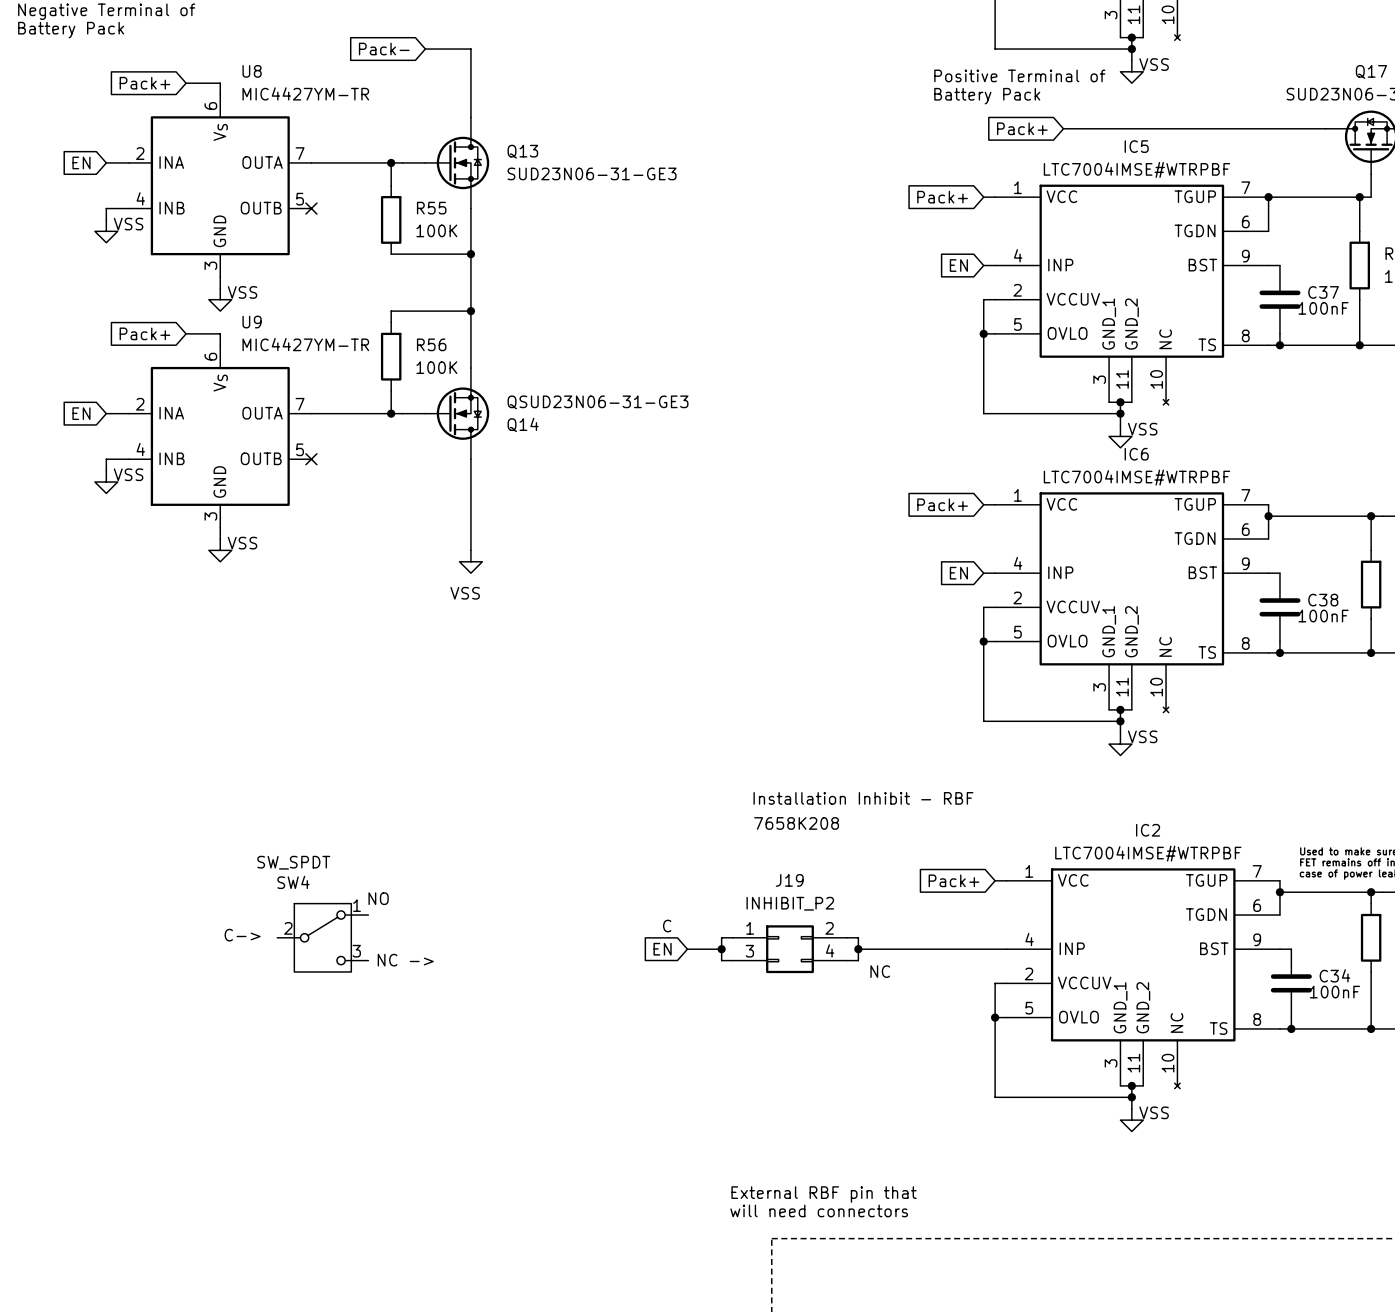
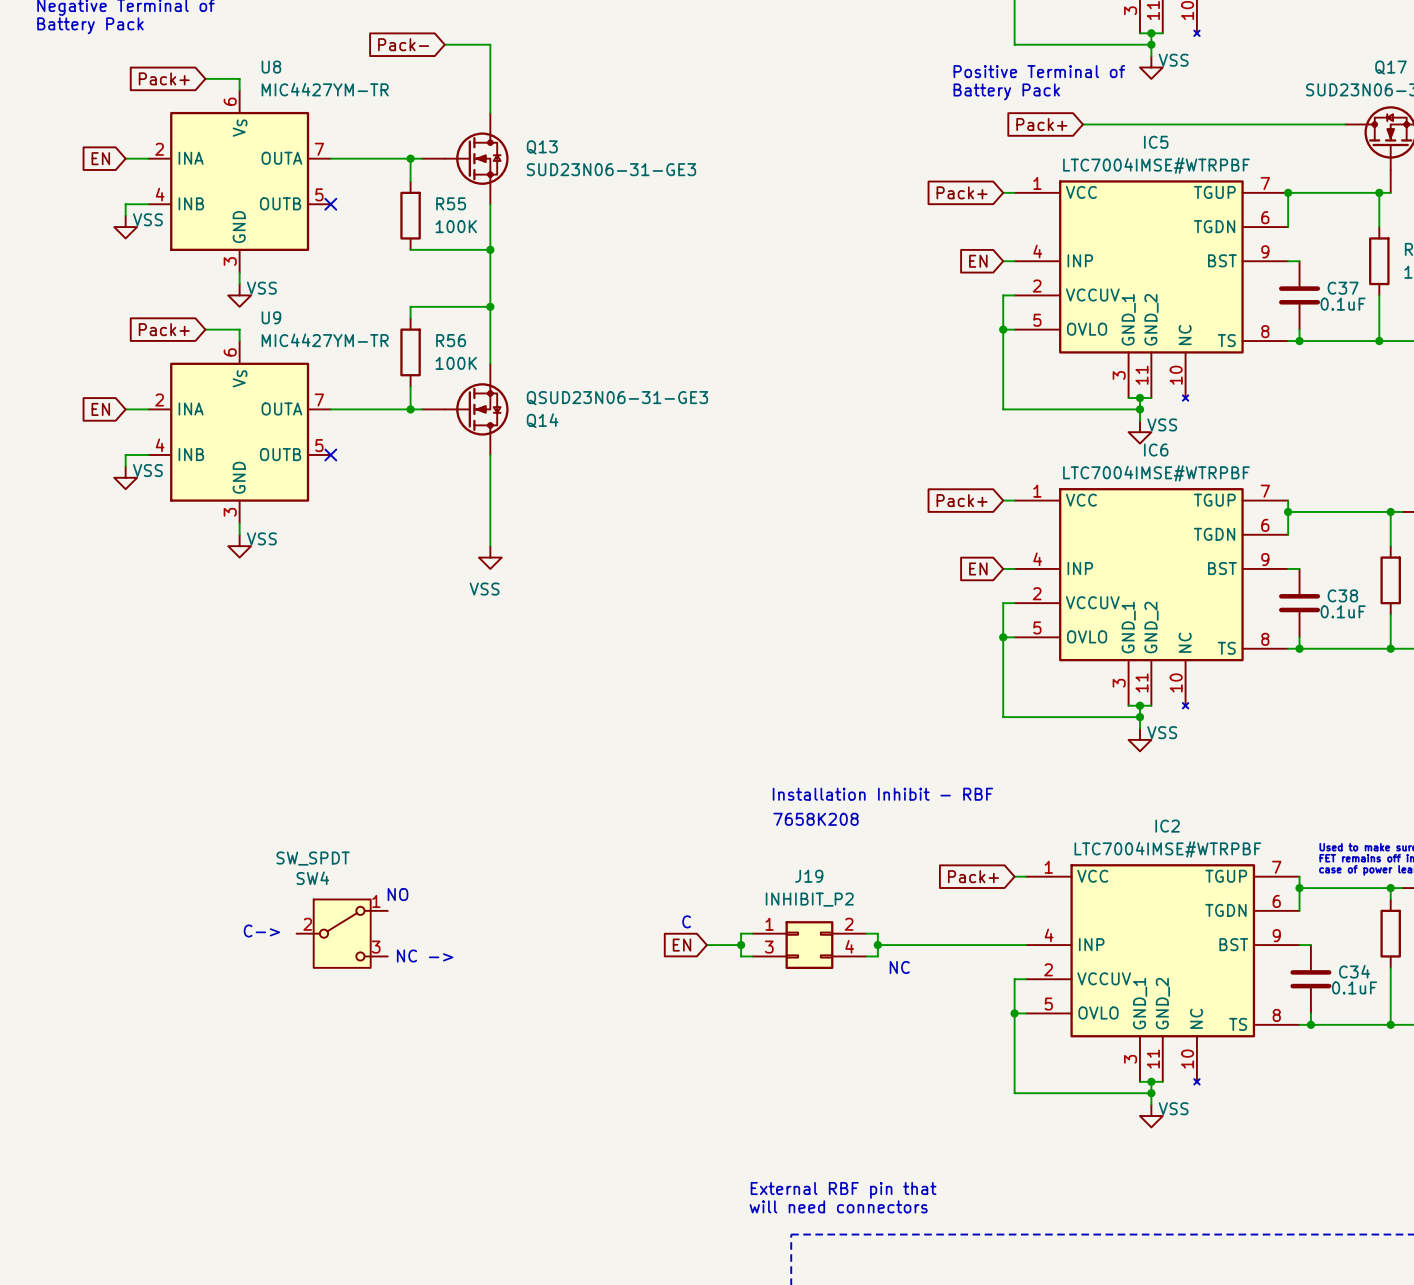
C37 value: 100nF (1323, 308) -> 0.1uF (1343, 304)
C38 value: 100nF (1323, 616) -> 0.1uF (1343, 611)
C34 value: 100nF (1334, 992) -> 0.1uF (1354, 987)

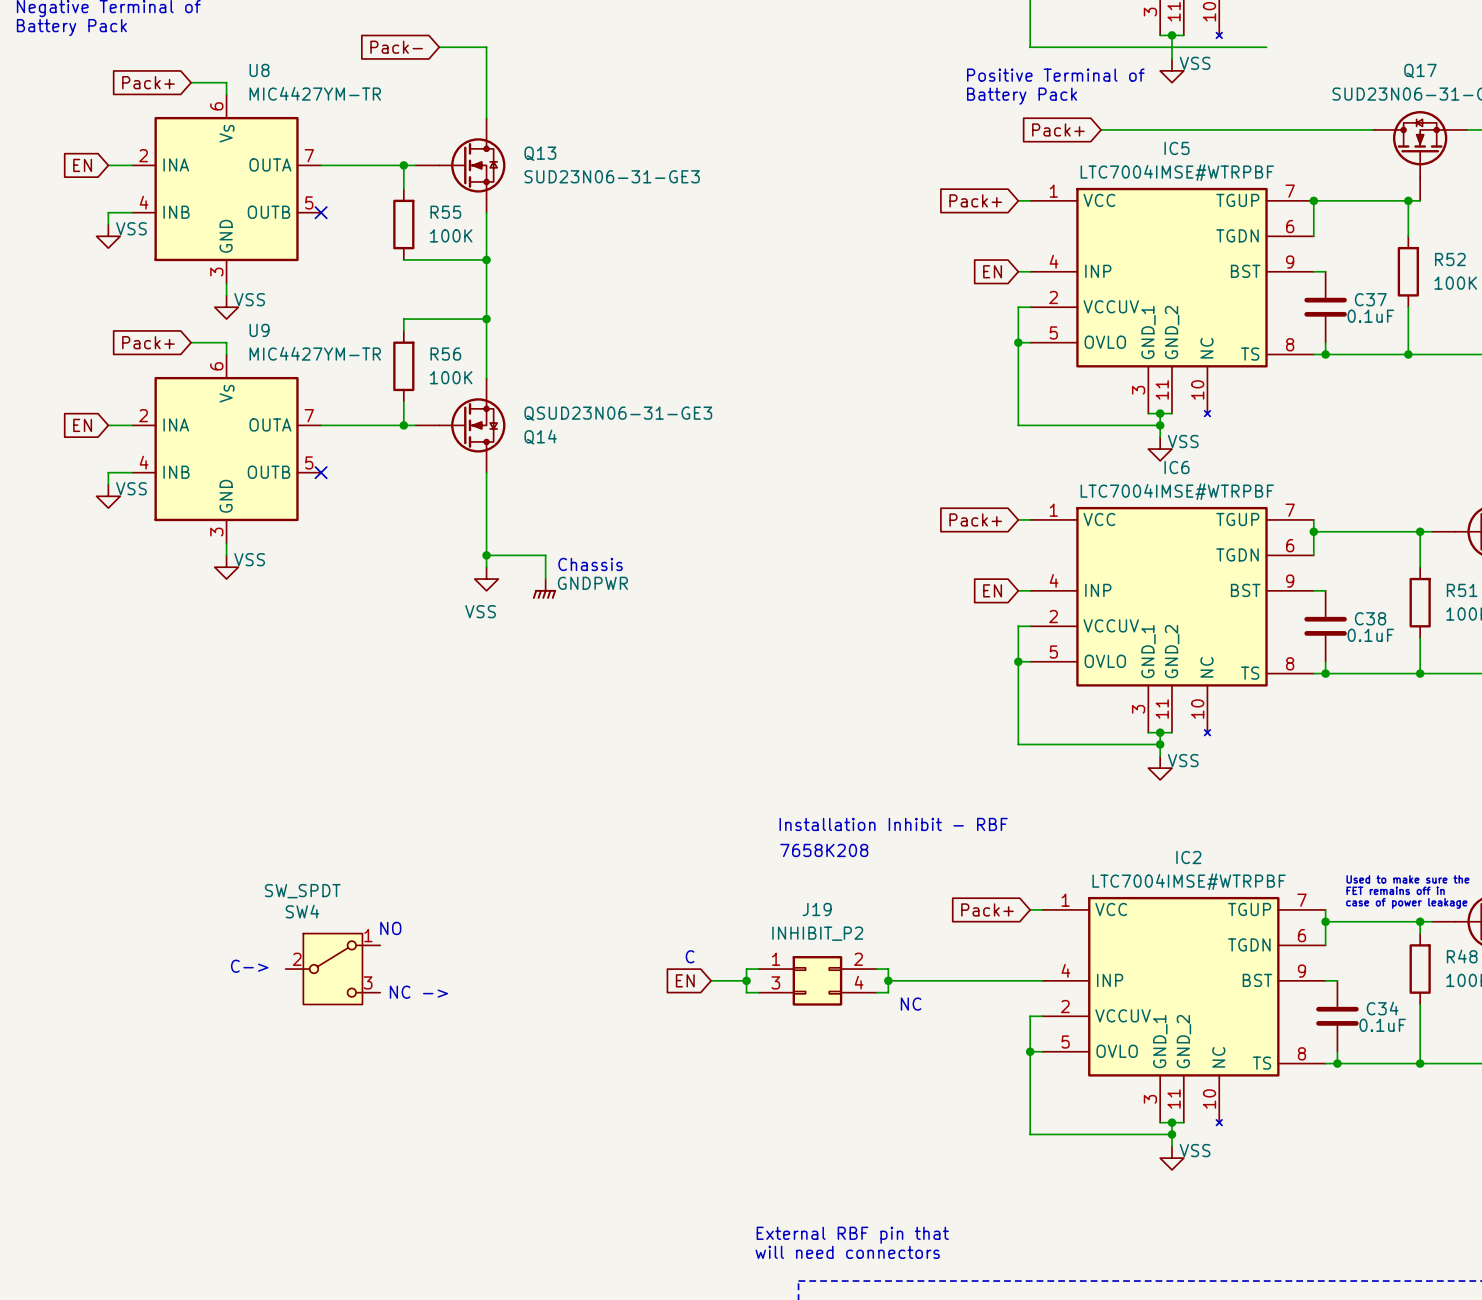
wire: none -> (1171, 47) (1266, 47)
junction: (1151, 44) -> none
wire: none -> (486, 555) (545, 555) (545, 579)
junction: none -> (486, 555)
text: none -> Chassis (590, 564)
power symbol: none -> GNDPWR (544, 588)

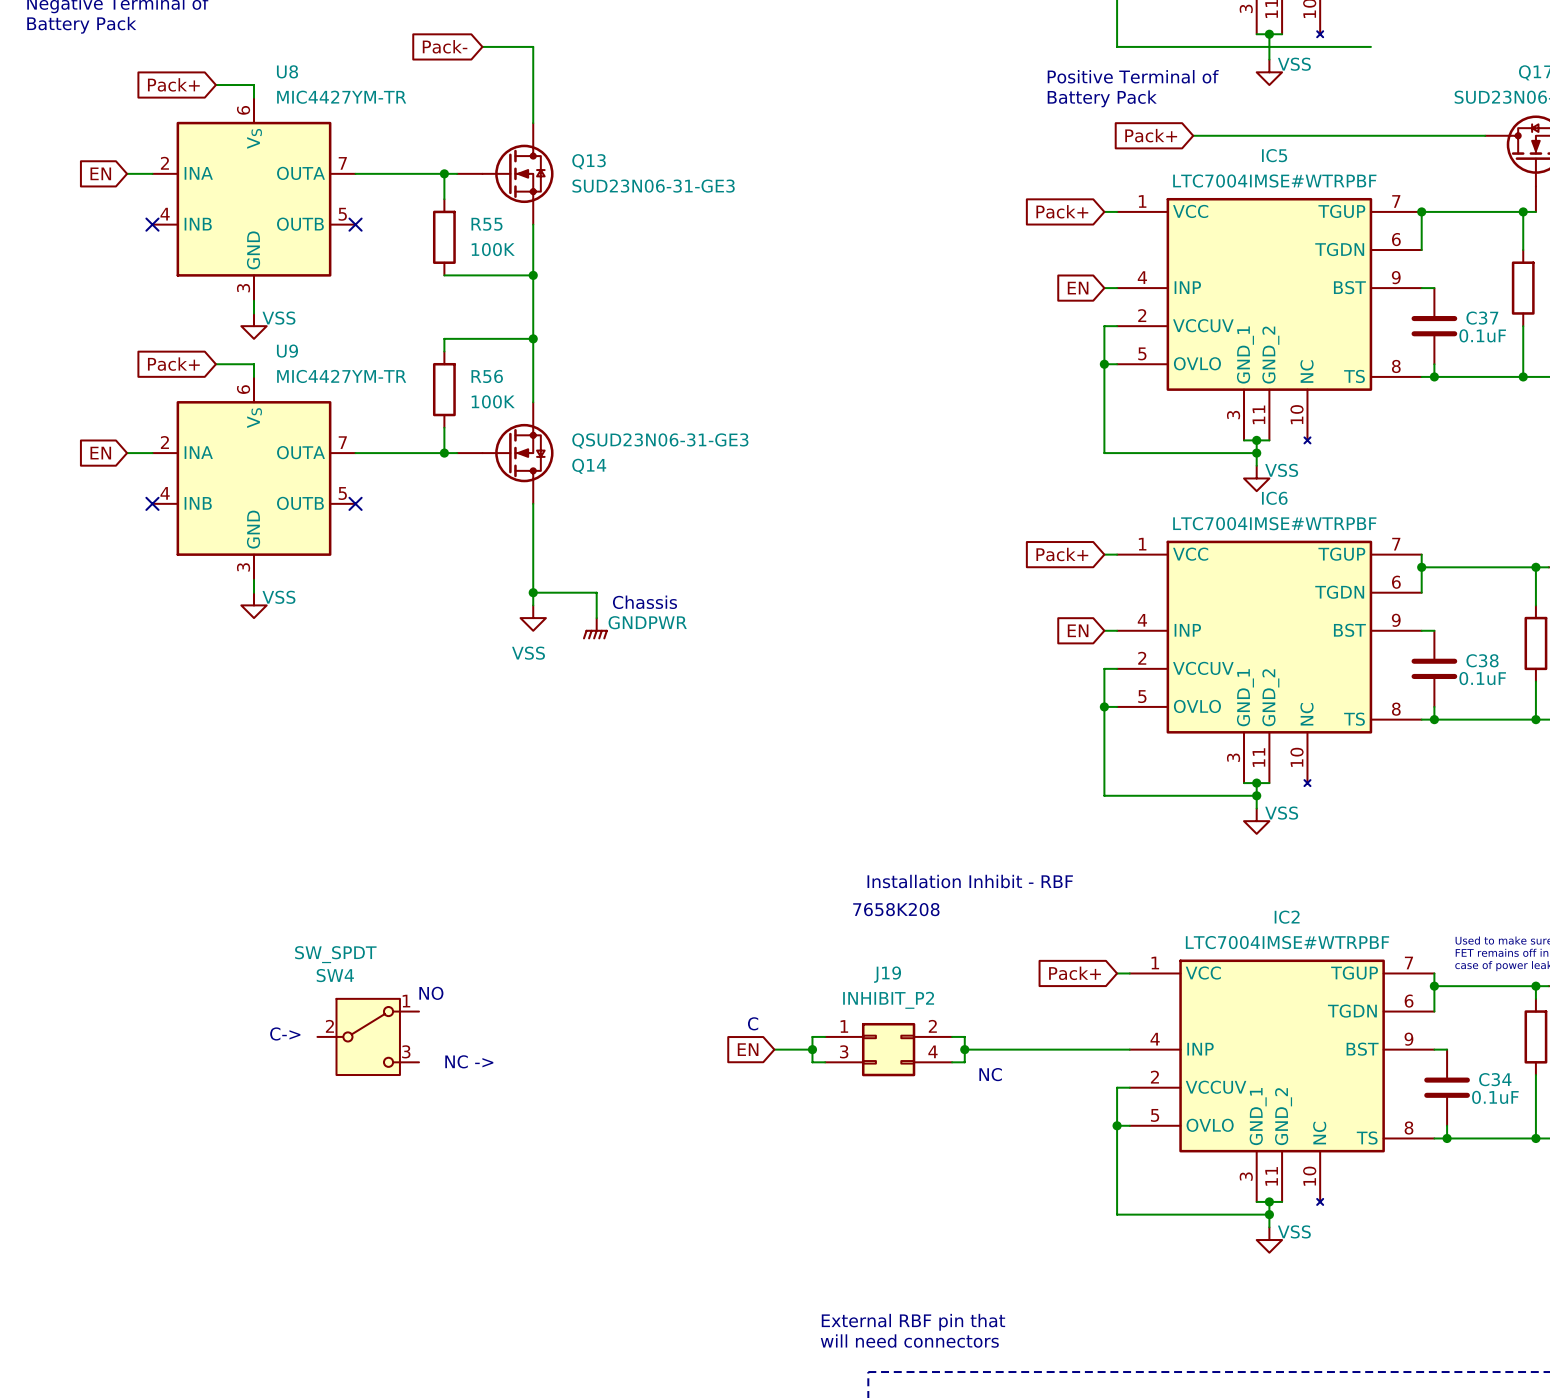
wire: (132, 212) (108, 212) (108, 224) -> none
no-connect mark: none -> (152, 224)
power symbol: VSS (108, 236) -> none
wire: (132, 472) (108, 472) (108, 484) -> none
no-connect mark: none -> (152, 503)
power symbol: VSS (108, 496) -> none

